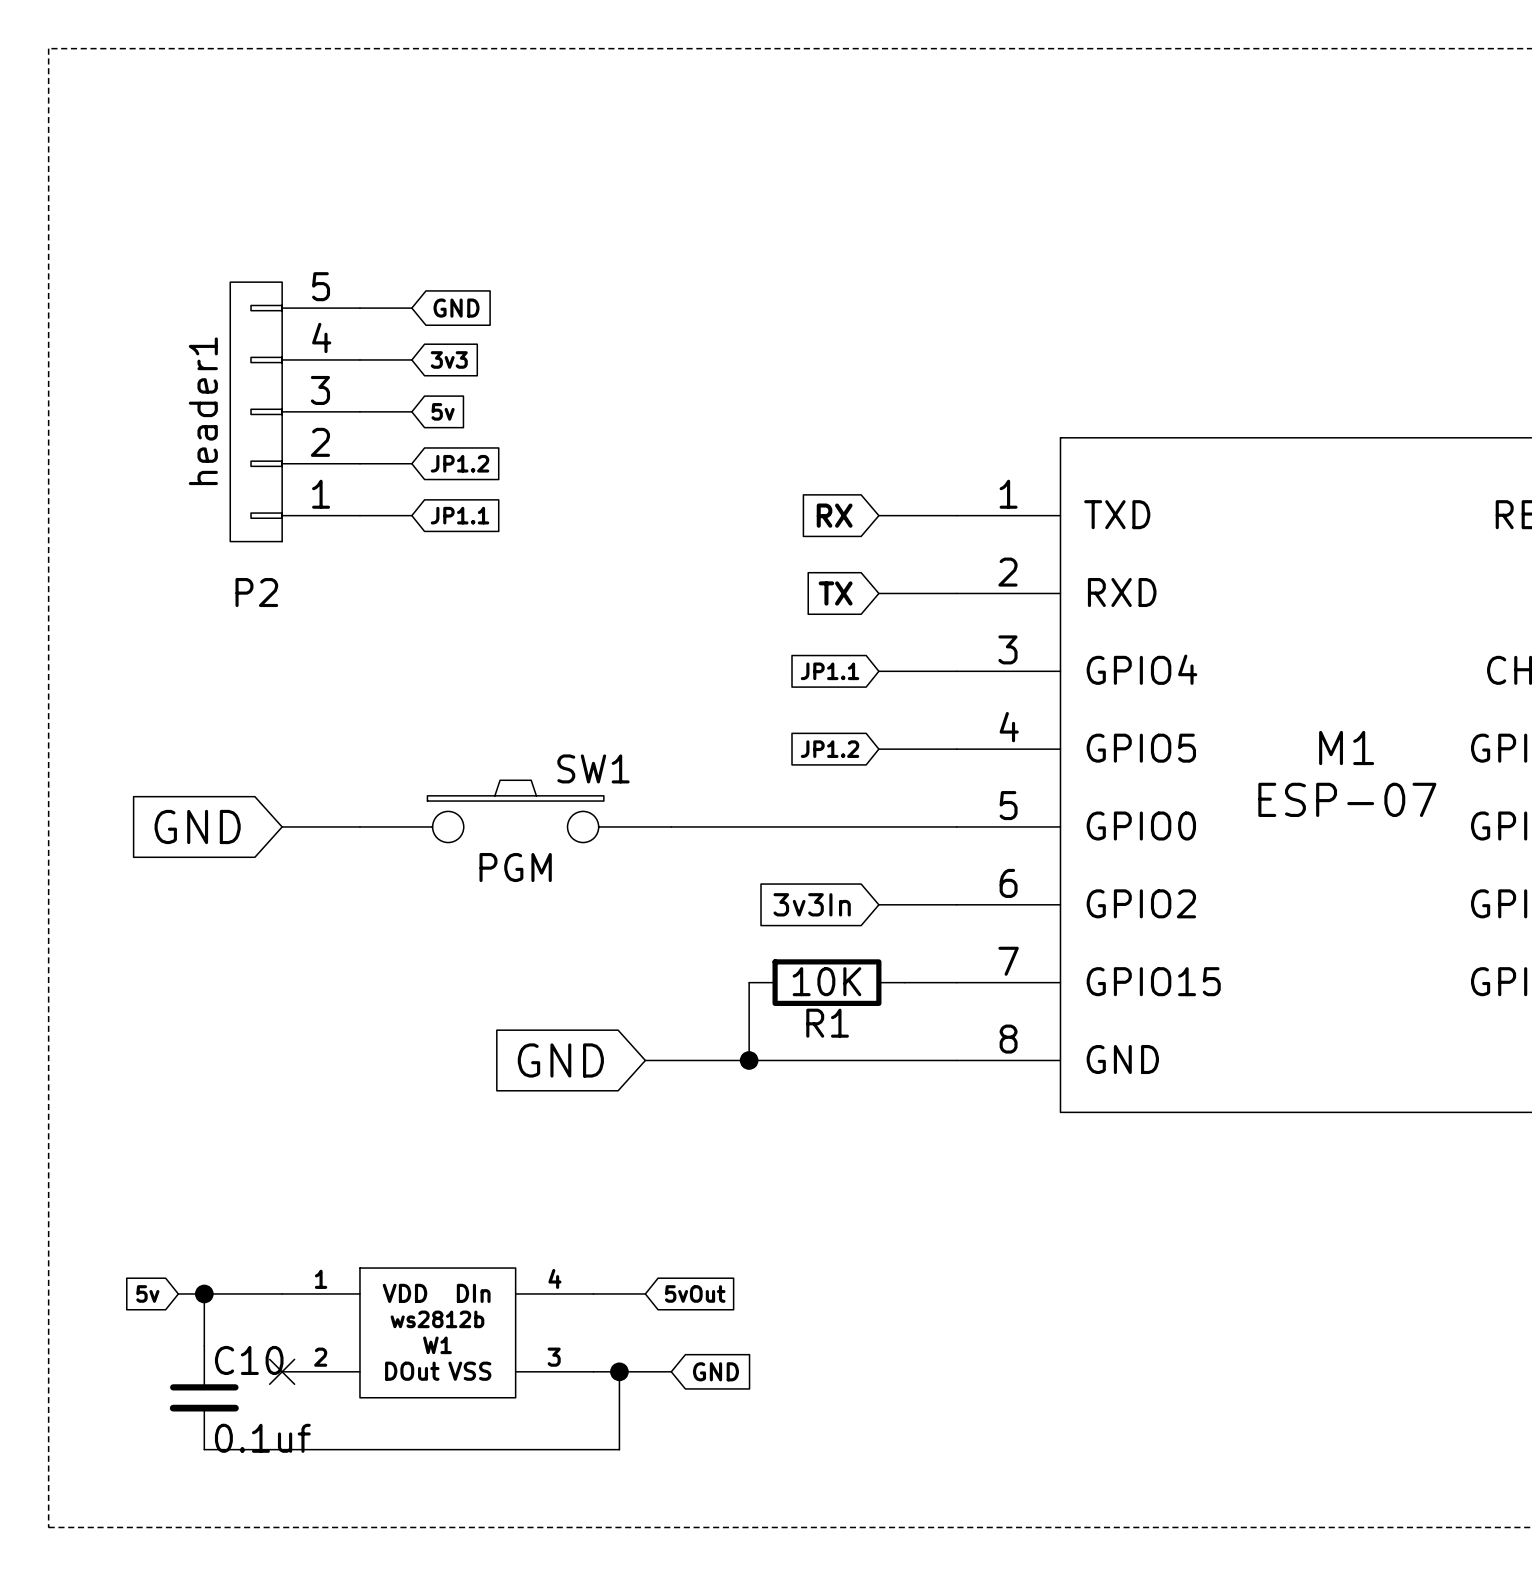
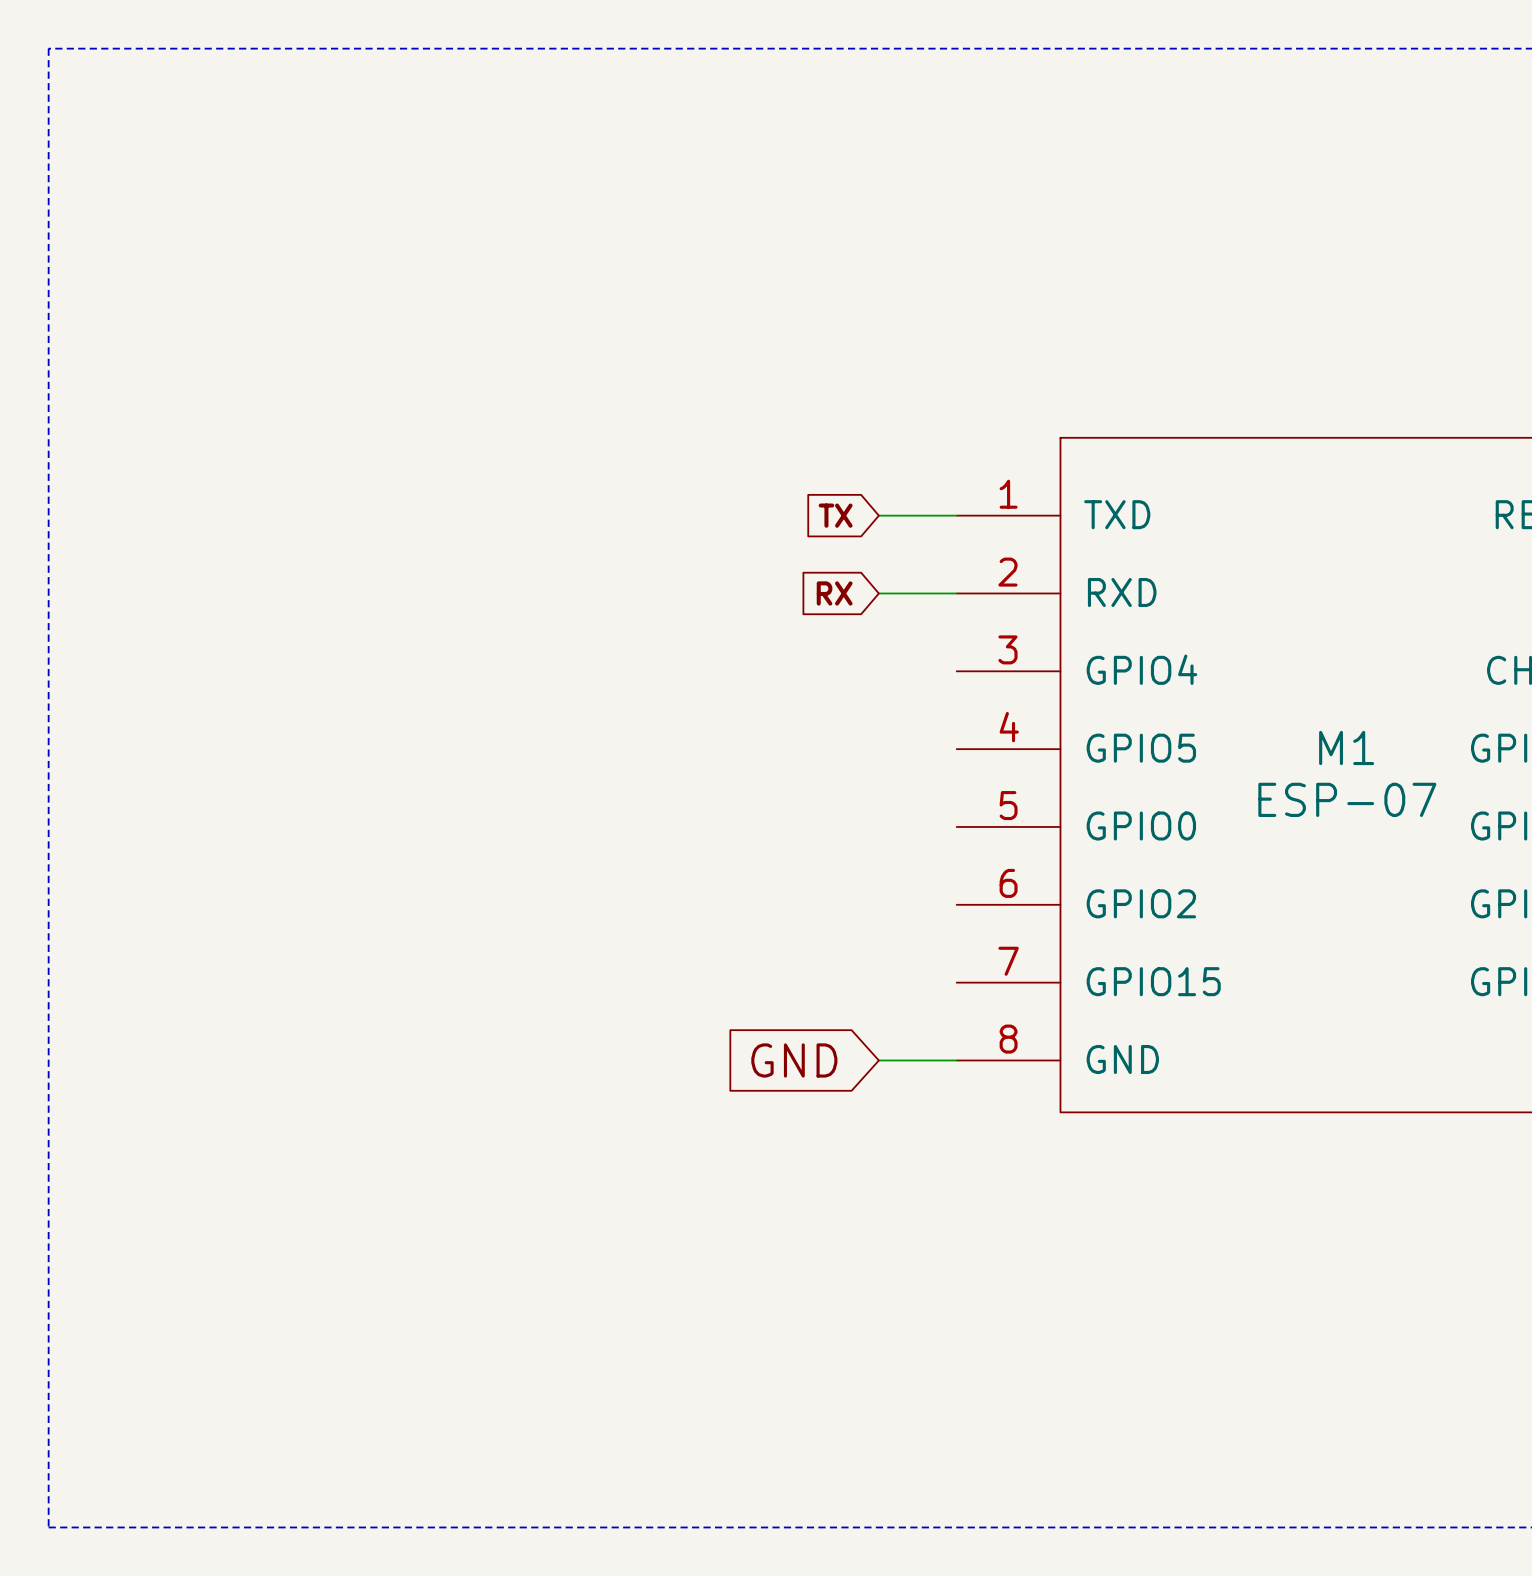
wire: (359, 308) (411, 308) -> none
global label: GND (456, 308) -> none
wire: (359, 359) (411, 359) -> none
global label: 3v3 (449, 359) -> none
P2: header1 (295, 411) -> none
wire: (359, 411) (411, 411) -> none
global label: 5v (443, 411) -> none
wire: (359, 463) (411, 463) -> none
global label: JP1.2 (460, 463) -> none
wire: (359, 515) (411, 515) -> none
global label: JP1.1 (460, 515) -> none
global label: RX (834, 515) -> TX (835, 515)
global label: TX (835, 593) -> RX (834, 593)
global label: JP1.1 (830, 671) -> none
wire: (878, 671) (956, 671) -> none
global label: JP1.2 (830, 749) -> none
wire: (878, 749) (956, 749) -> none
SW1: PGM (515, 811) -> none
global label: GND (197, 826) -> none
wire: (282, 826) (359, 826) -> none
wire: (671, 826) (956, 826) -> none
global label: 3v3In (812, 904) -> none
wire: (878, 904) (956, 904) -> none
wire: (749, 982) (749, 1060) -> none
R1: 10K (826, 982) -> none
wire: (904, 982) (956, 982) -> none
global label: GND (560, 1060) -> none
wire: (645, 1060) (878, 1060) -> none
junction: (749, 1060) -> none
global label: none -> GND (794, 1060)
global label: 5v (147, 1293) -> none
wire: (178, 1293) (282, 1293) -> none
wire: (204, 1293) (204, 1345) -> none
junction: (204, 1293) -> none
wire: (593, 1293) (645, 1293) -> none
global label: 5vOut (695, 1293) -> none
W1: ws2812b (437, 1332) -> none
no-connect mark: (282, 1371) -> none
wire: (593, 1371) (671, 1371) -> none
wire: (619, 1371) (619, 1449) (204, 1449) -> none
junction: (619, 1371) -> none
global label: GND (715, 1371) -> none
C10: 0.1uf (204, 1397) -> none

